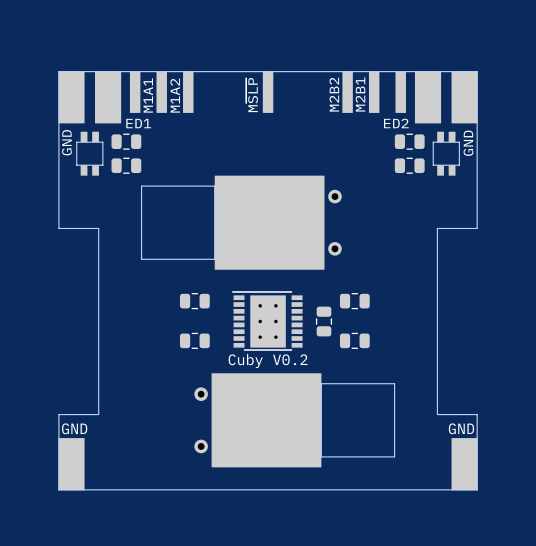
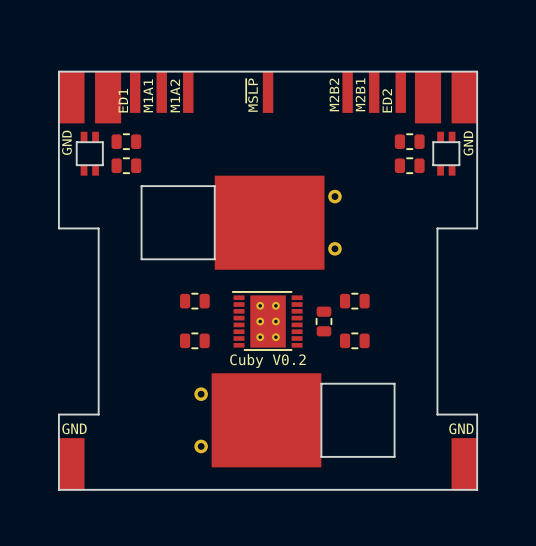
part value rotation: 0° (138, 123) -> 90° counterclockwise (123, 100)
part value rotation: 0° (396, 123) -> 90° counterclockwise (387, 100)

